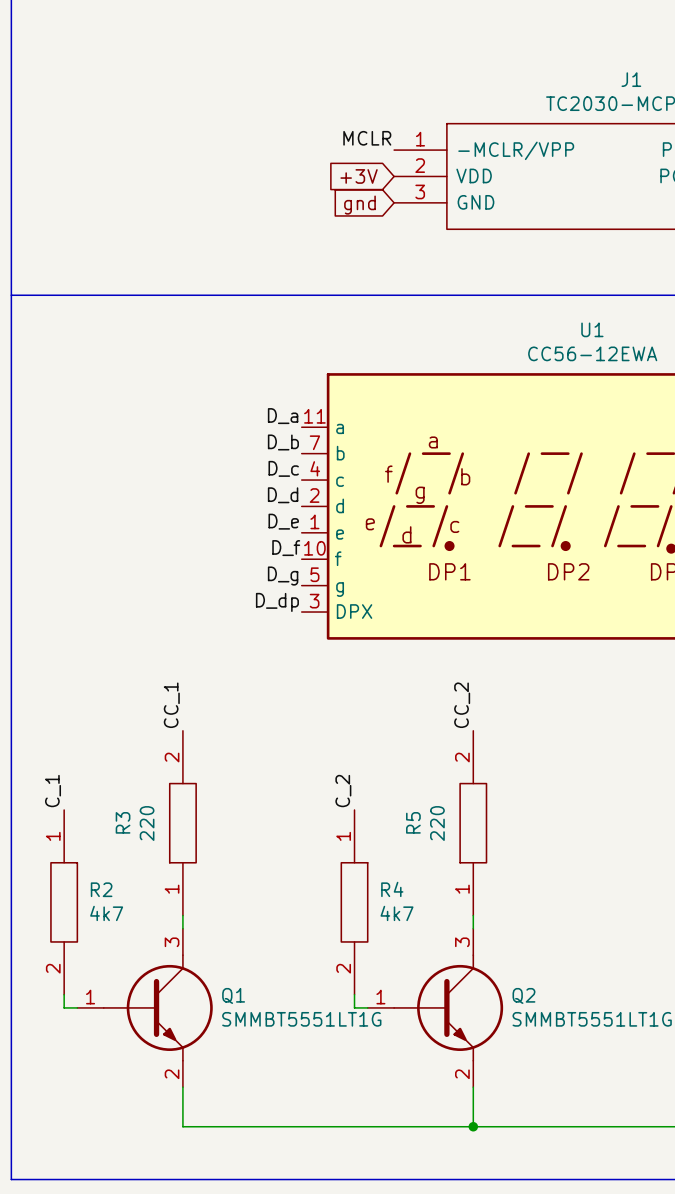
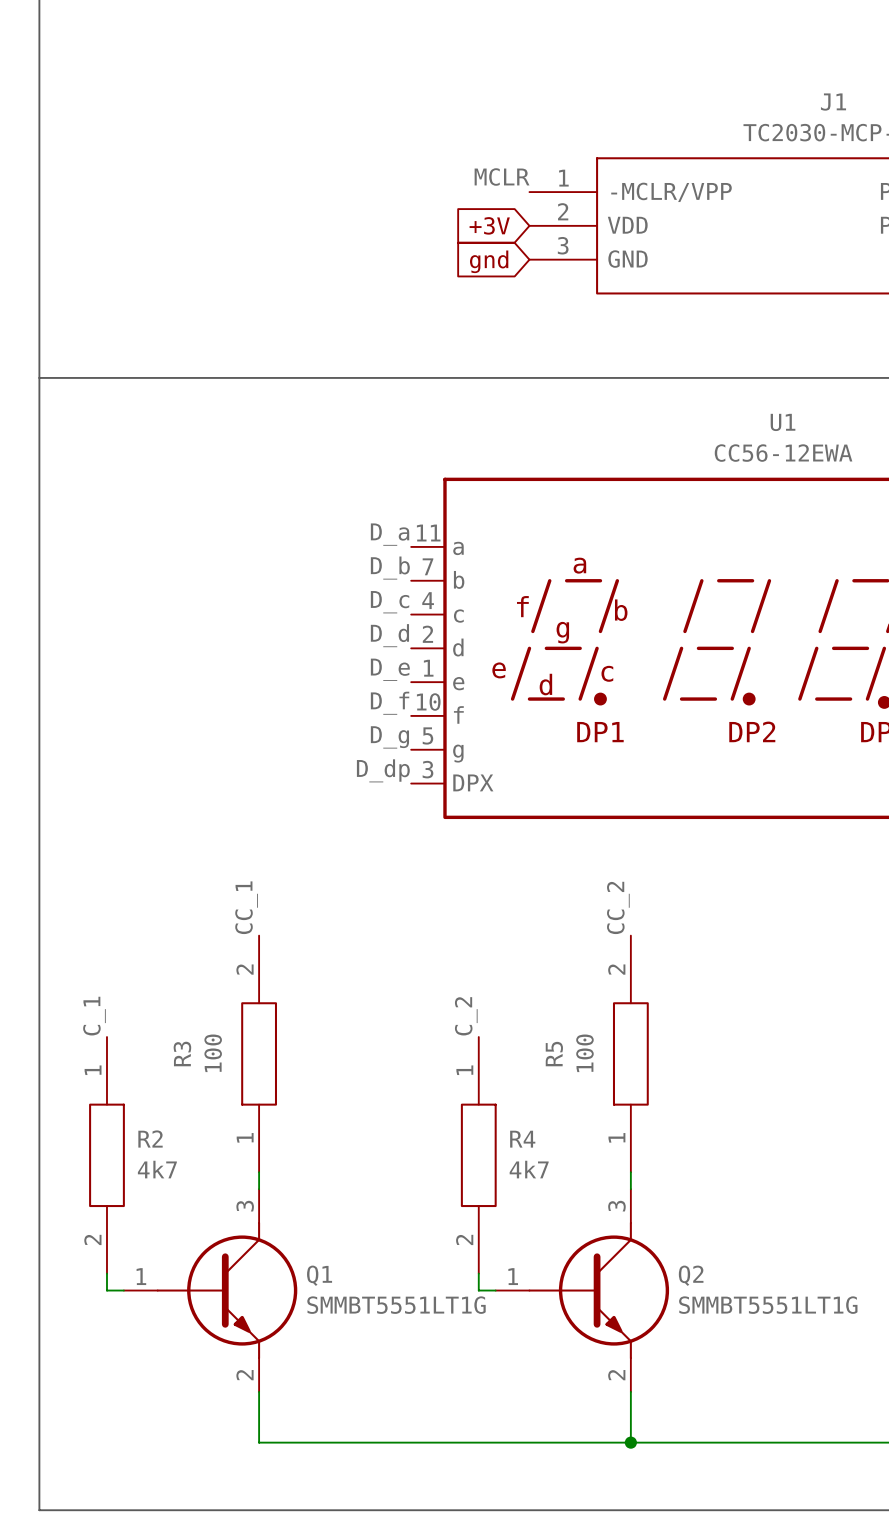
R3 value: 220 (147, 823) -> 100 (213, 1053)
R5 value: 220 (437, 823) -> 100 (584, 1053)

